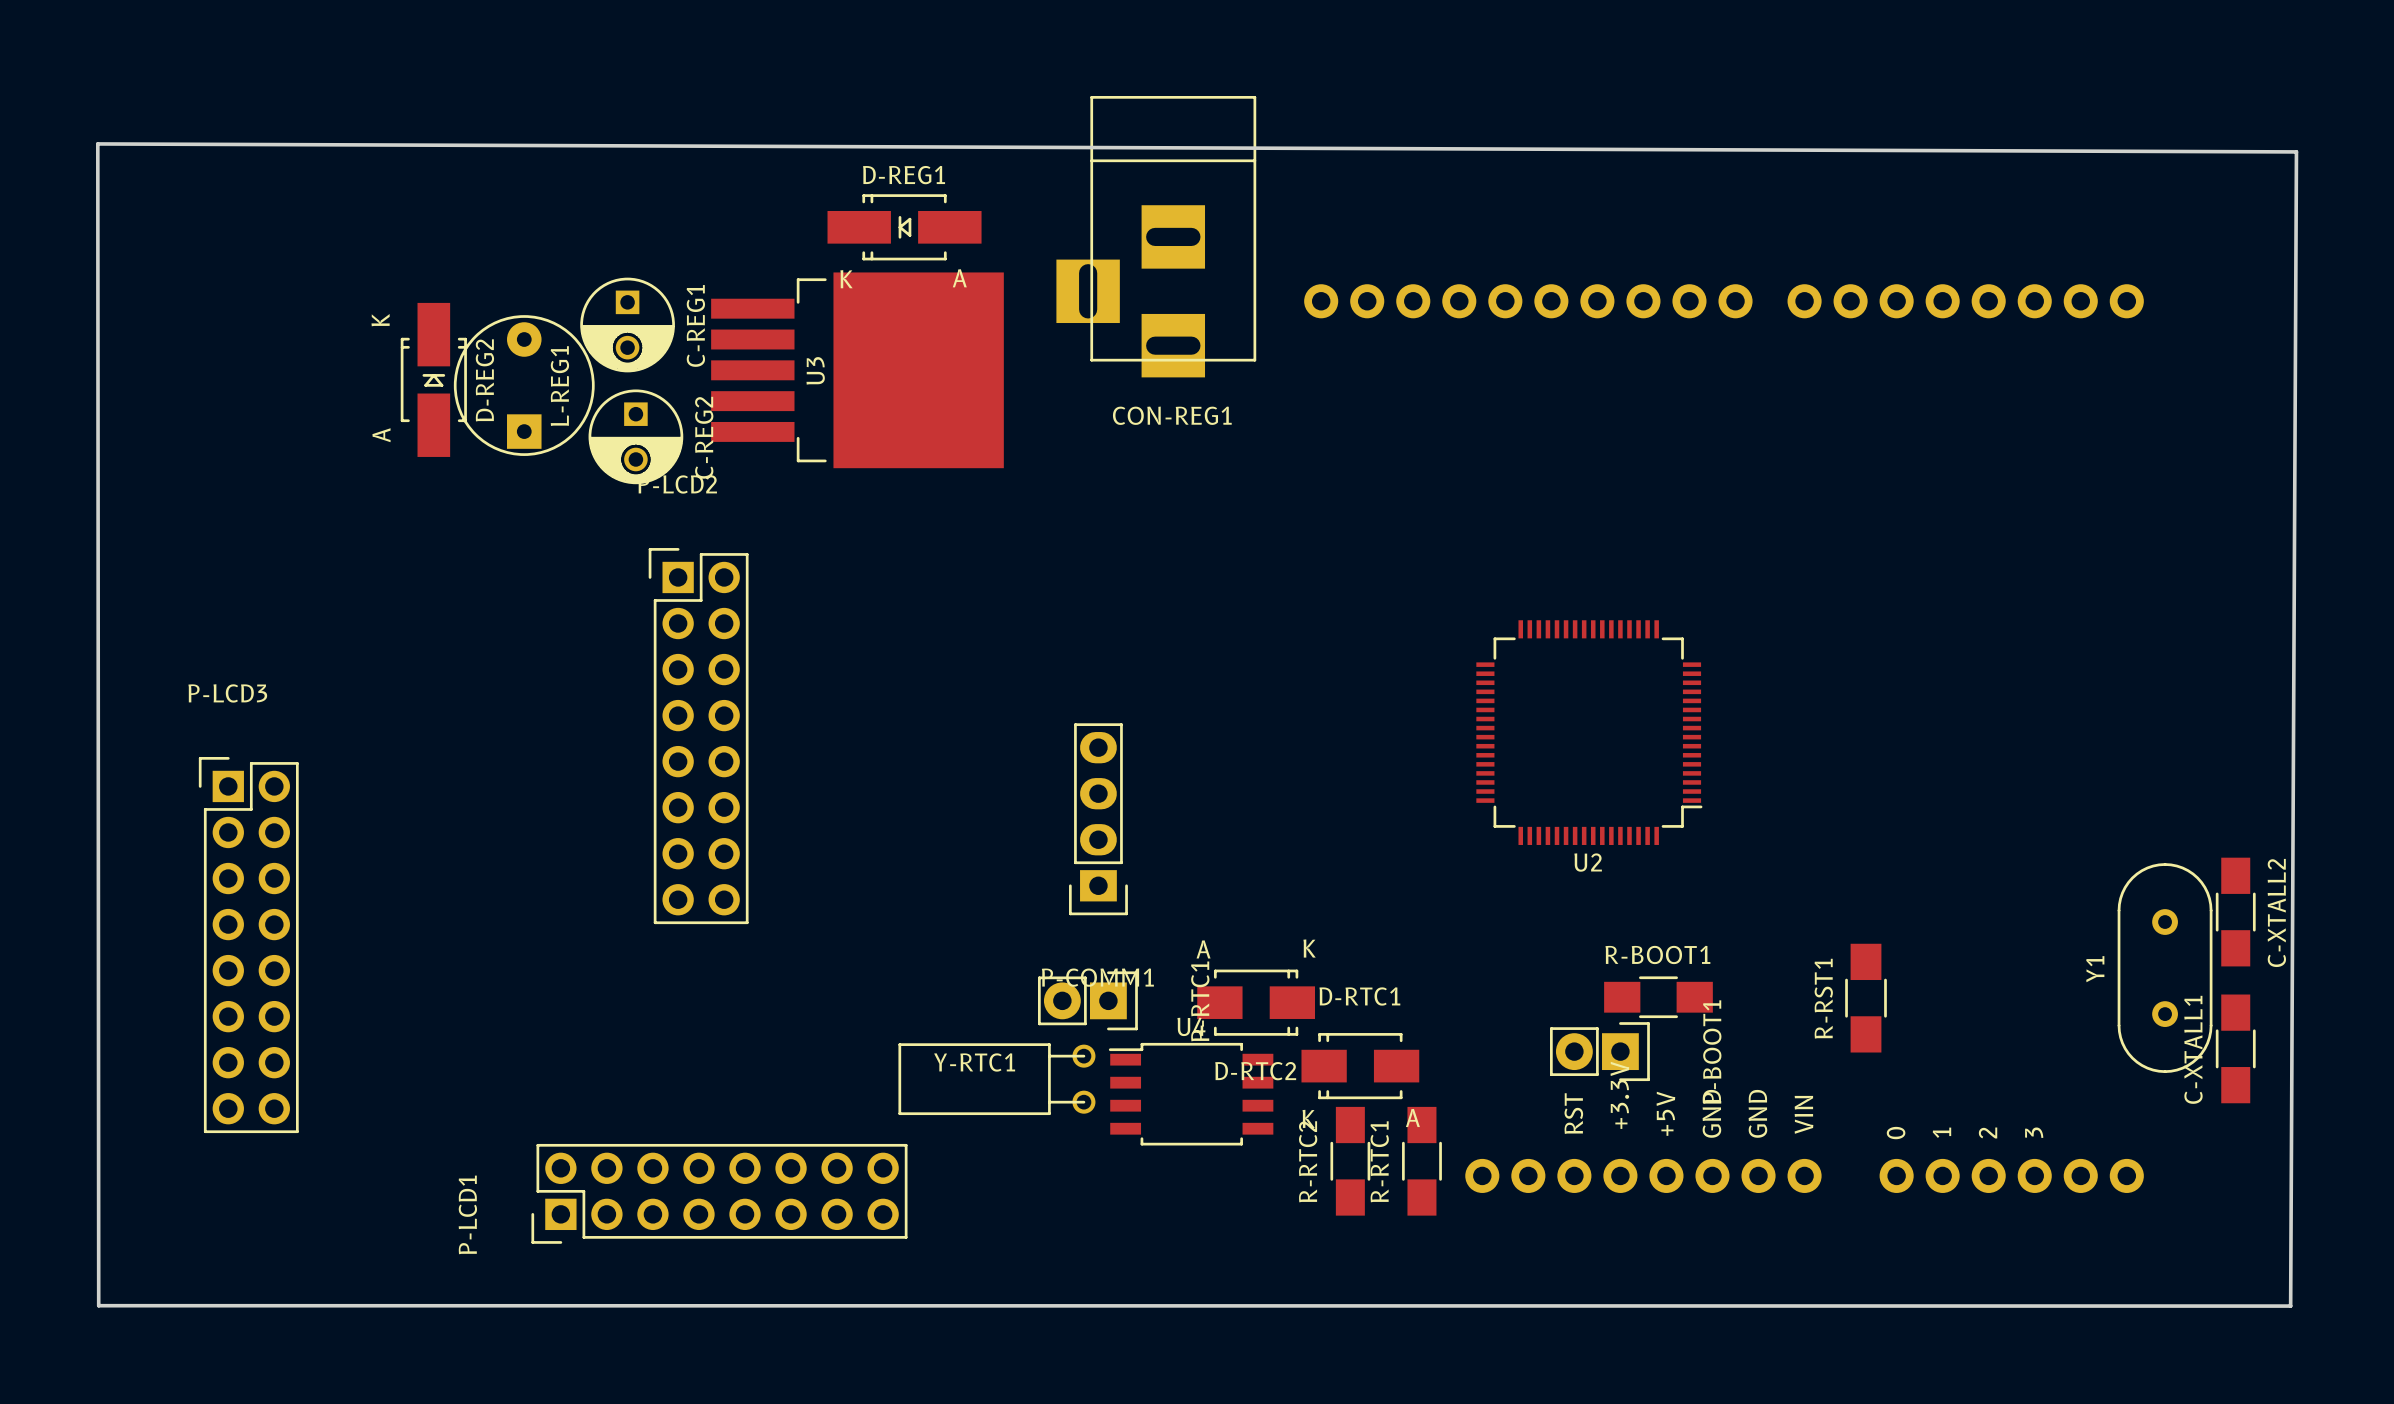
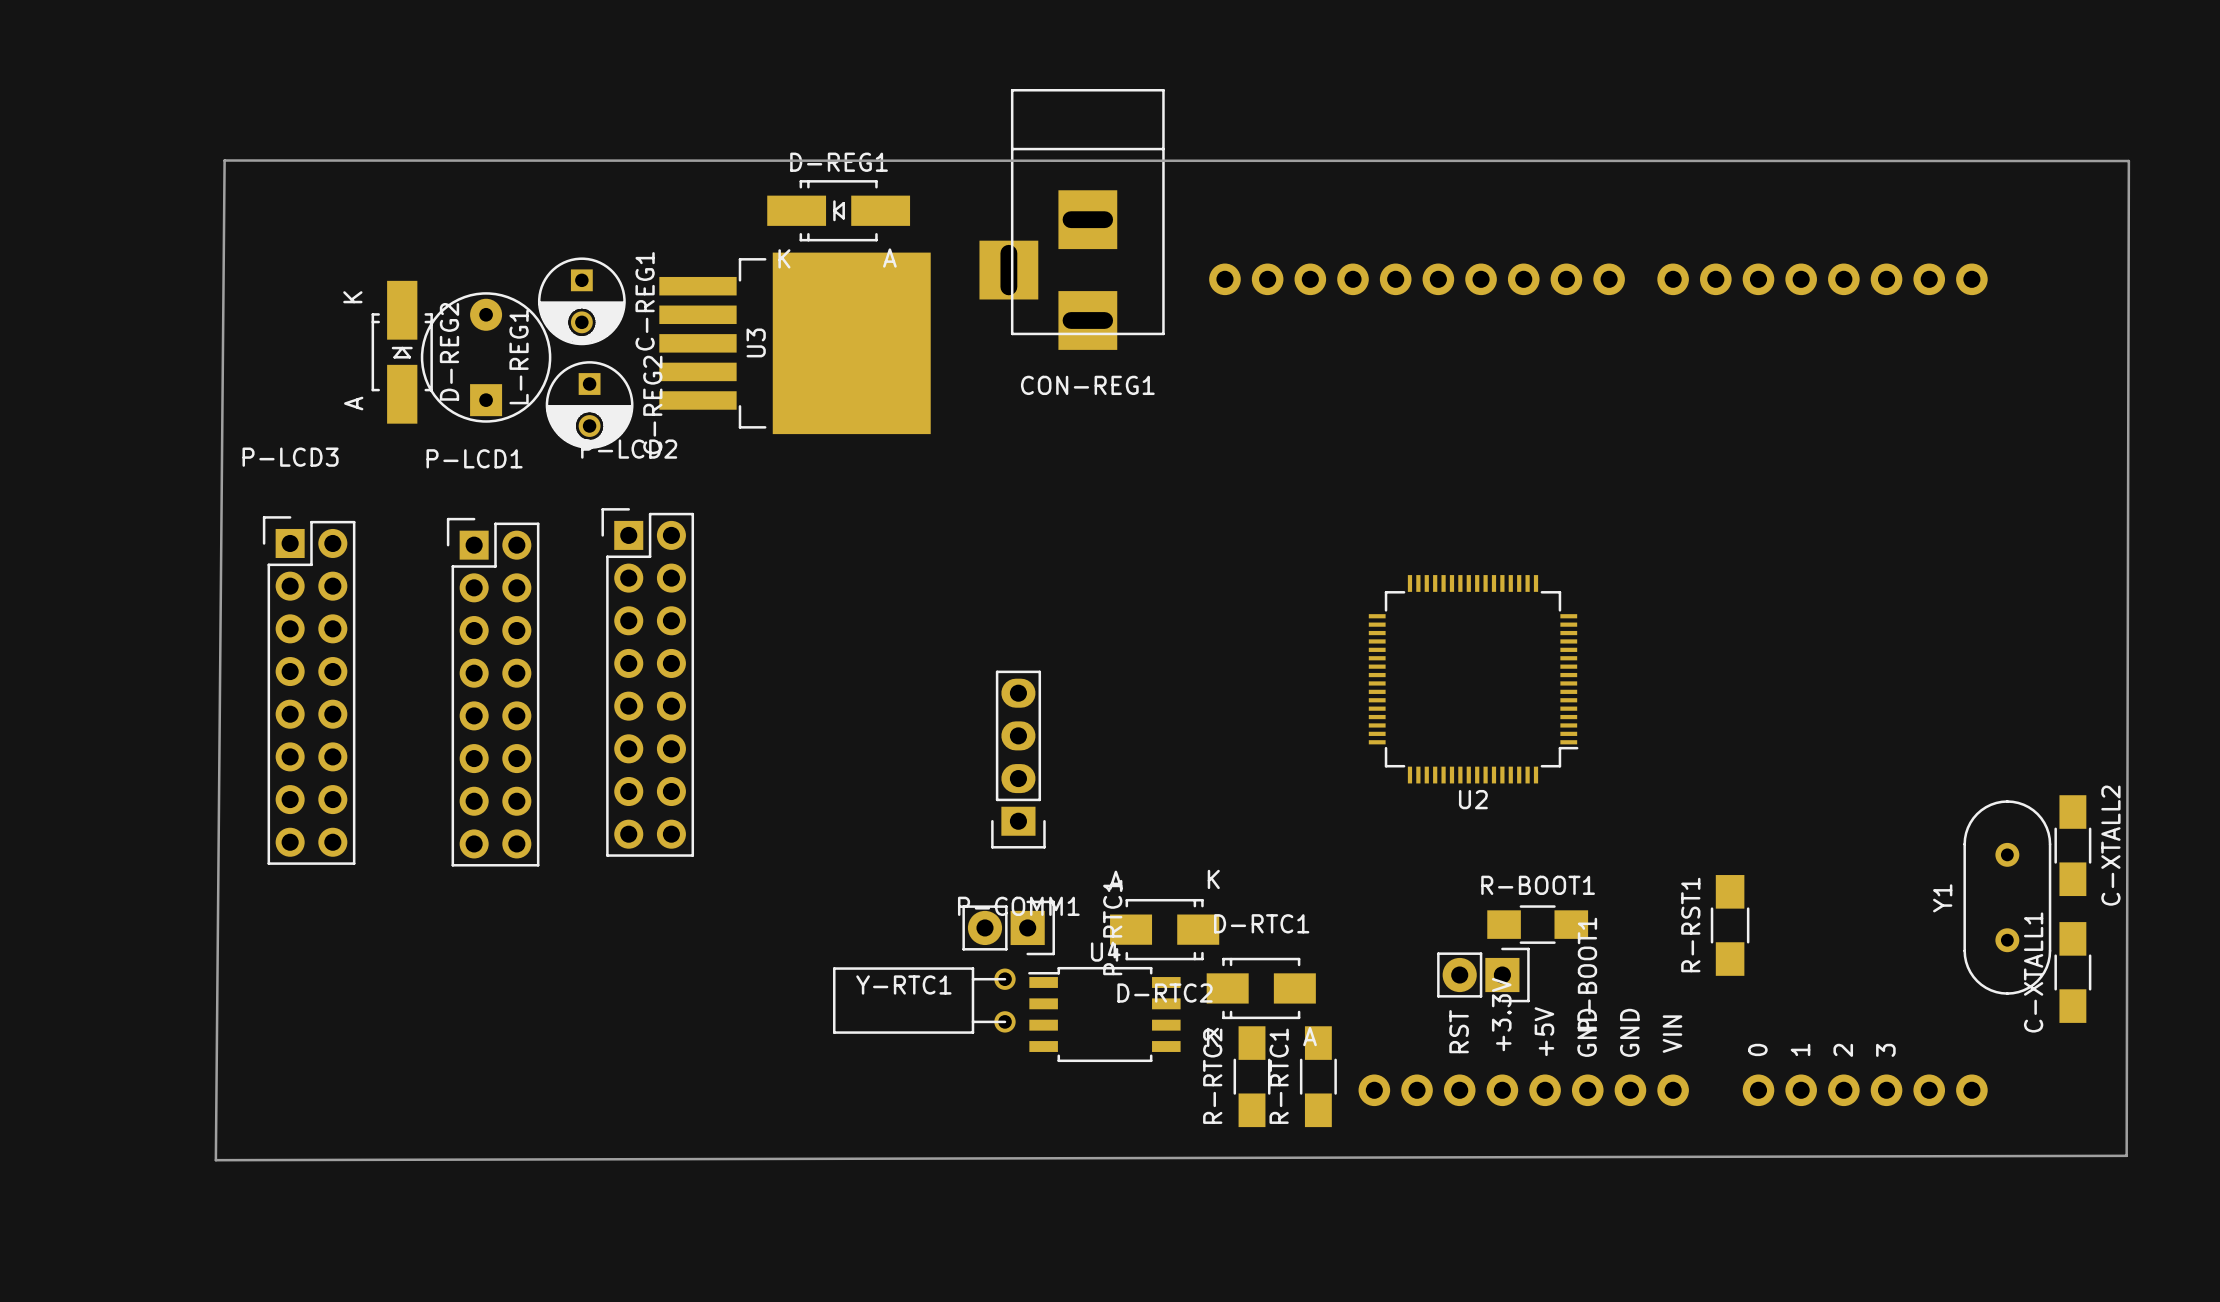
board edge: (97, 143) (98, 1305) (2290, 1306) (2296, 151) (97, 143) -> (224, 160) (215, 1160) (2126, 1155) (2128, 161) (224, 160)
P-LCD3 position: (248, 945) -> (309, 690)
P-LCD1 rotation: 0° (719, 1193) -> 90° clockwise (493, 692)
P-LCD1 position: (719, 1193) -> (493, 692)

